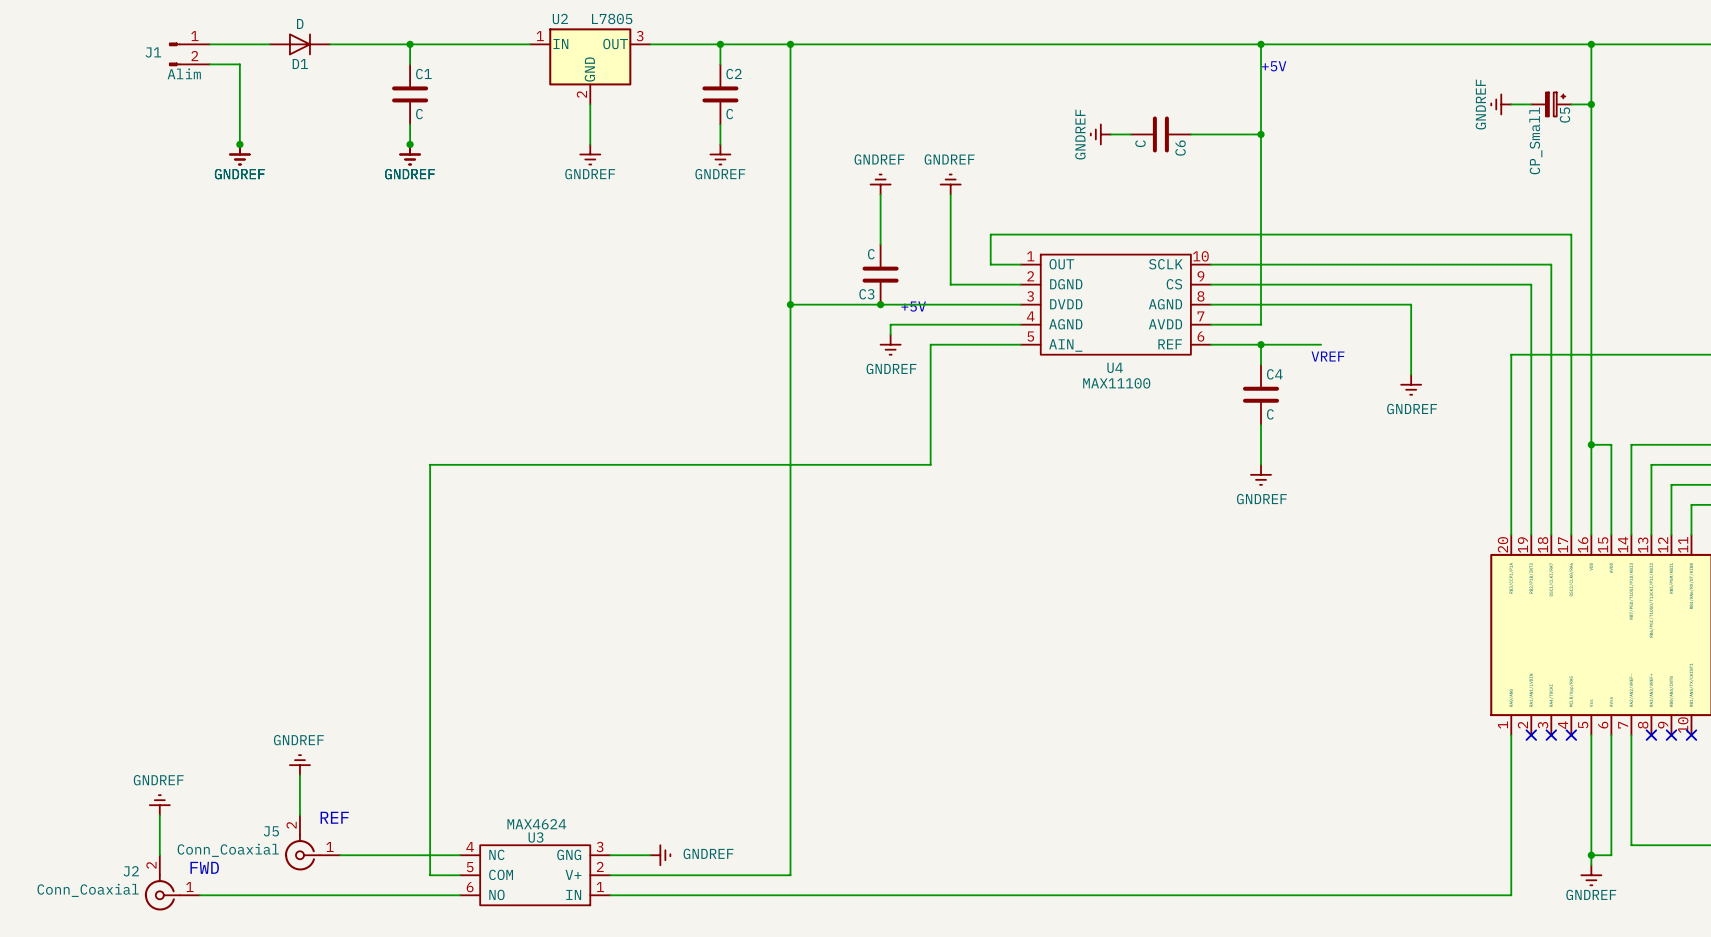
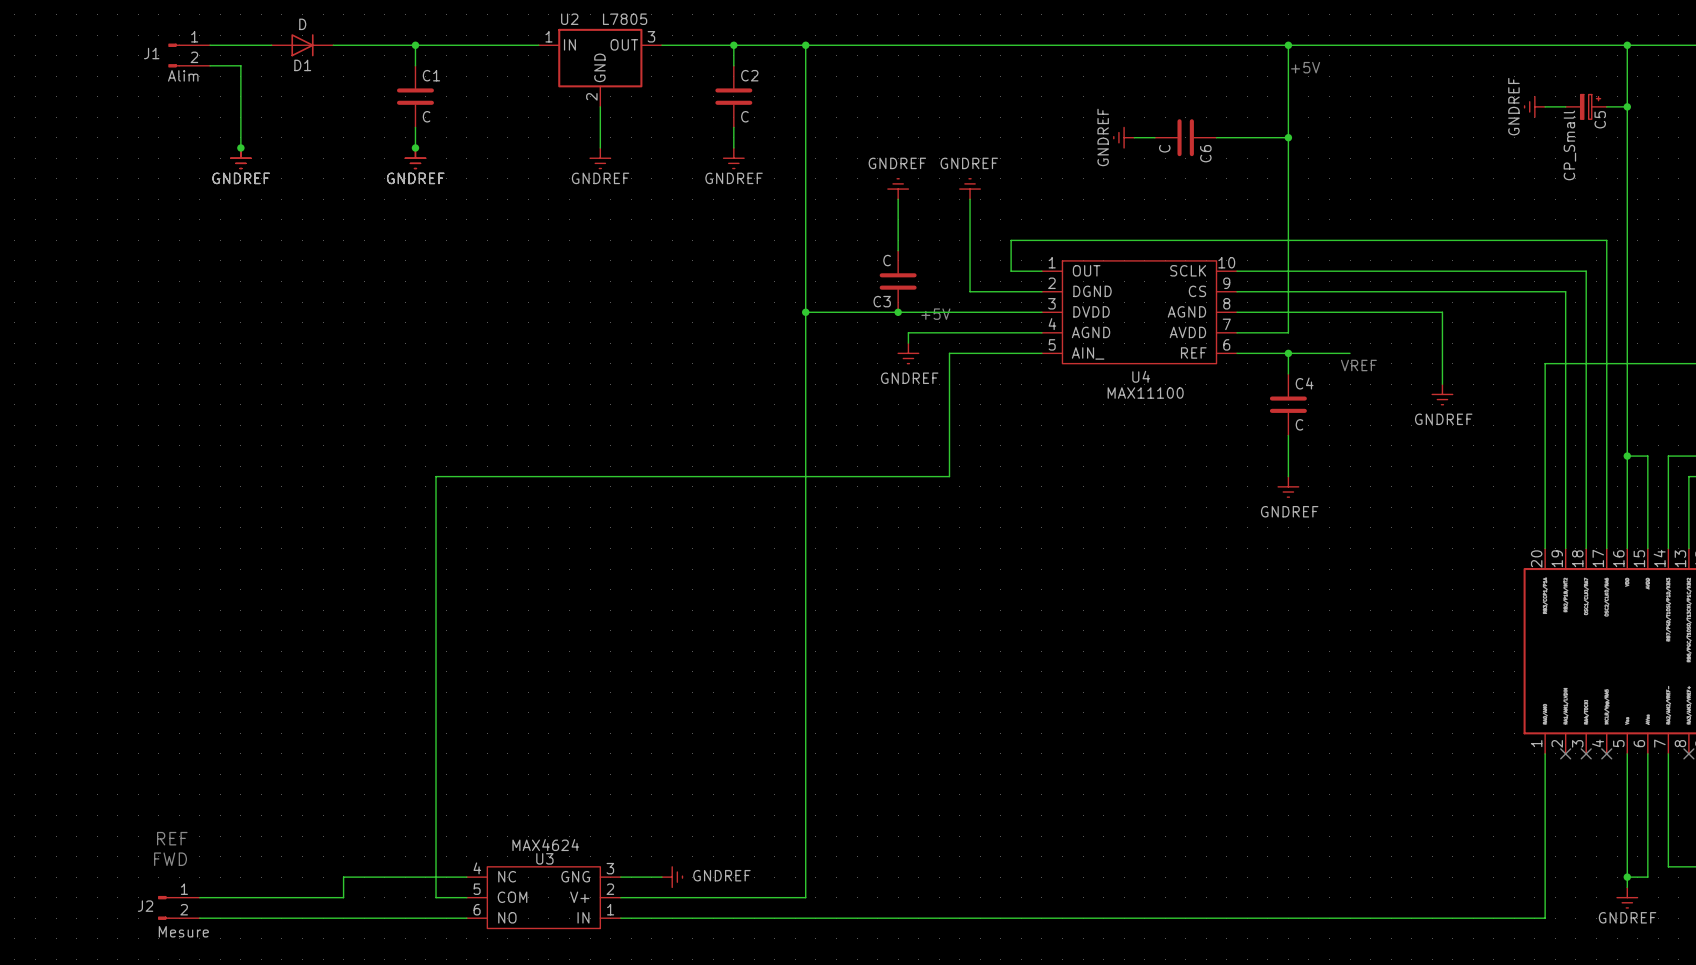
power symbol: GNDREF (299, 765) -> none
wire: (299, 775) (299, 815) -> none
power symbol: GNDREF (159, 805) -> none
wire: (159, 815) (159, 855) -> none
text position: REF (334, 817) -> REF (172, 838)
J5: Conn_Coaxial (312, 842) -> none
J2 symbol: [144, 855, 200, 911] -> [158, 896, 200, 920]
wire: none -> (343, 877) (343, 897) (199, 897)
text position: FWD (204, 867) -> FWD (170, 859)
J2 value: Conn_Coaxial (88, 890) -> Mesure (183, 931)

